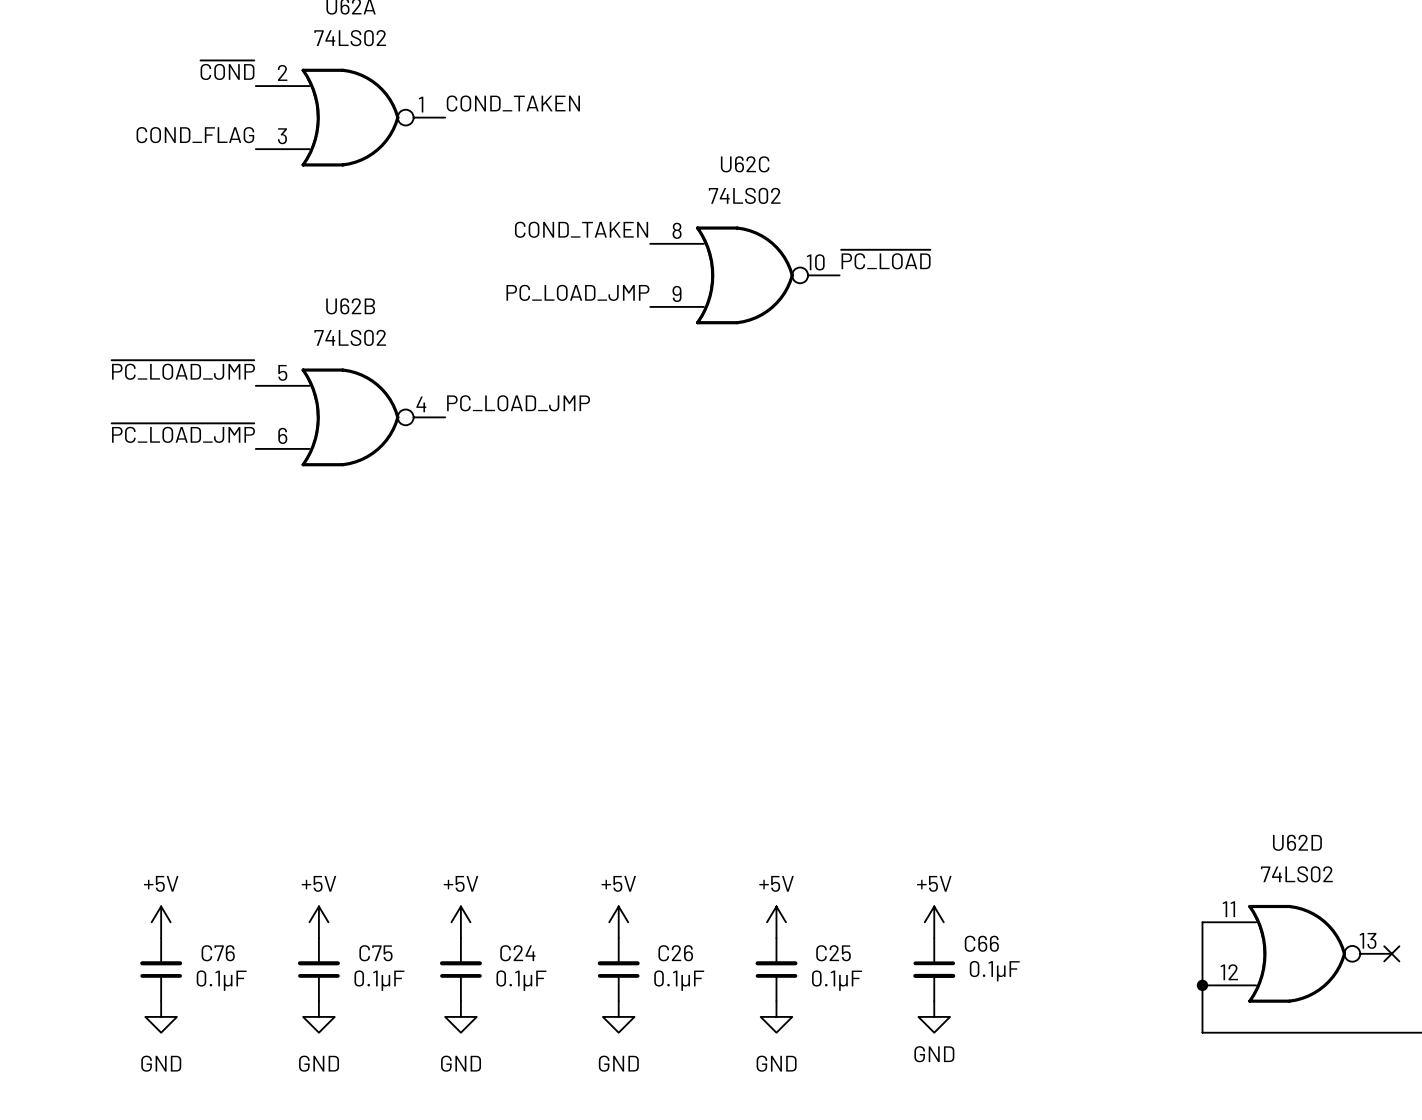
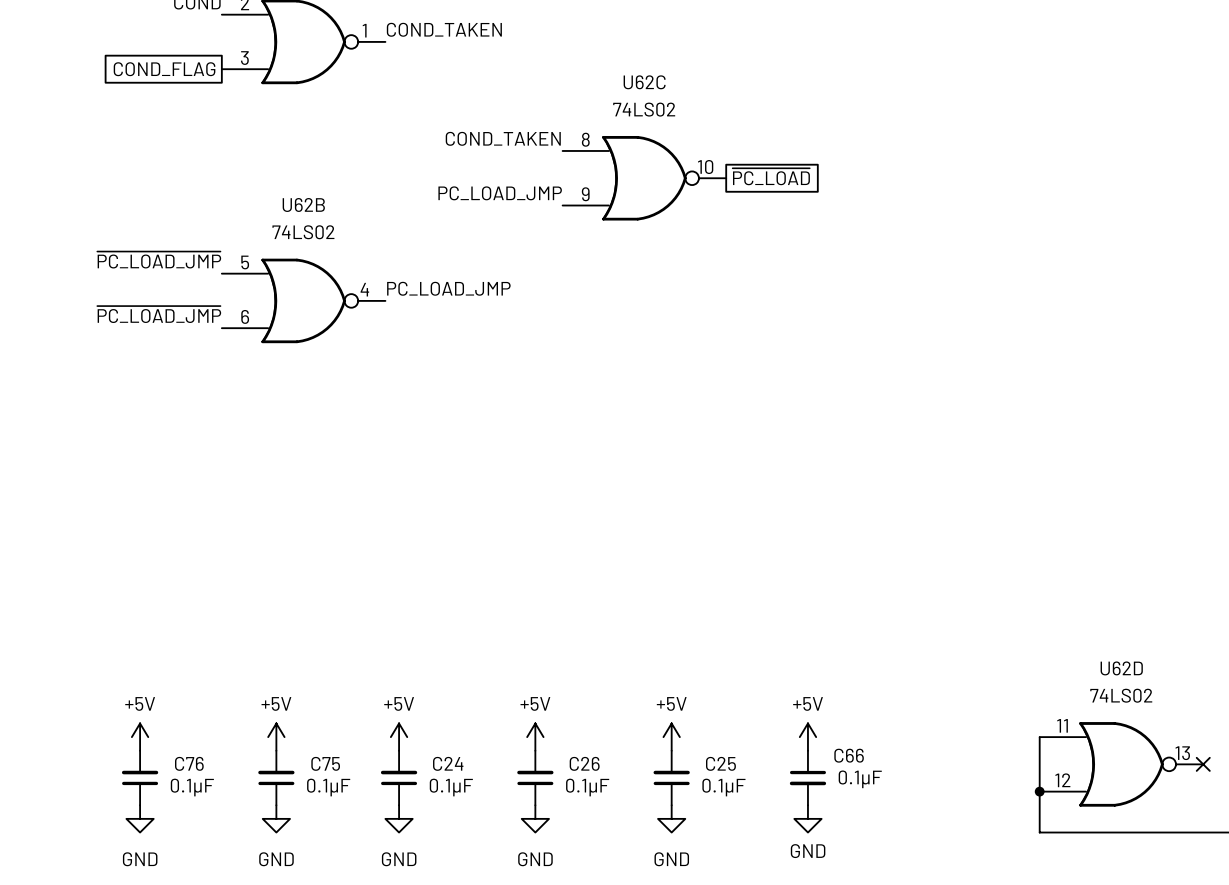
label: COND_FLAG (195, 135) -> none
global label: none -> COND_FLAG (164, 69)
label: ~{PC_LOAD} (885, 259) -> none
global label: none -> ~{PC_LOAD} (771, 176)

